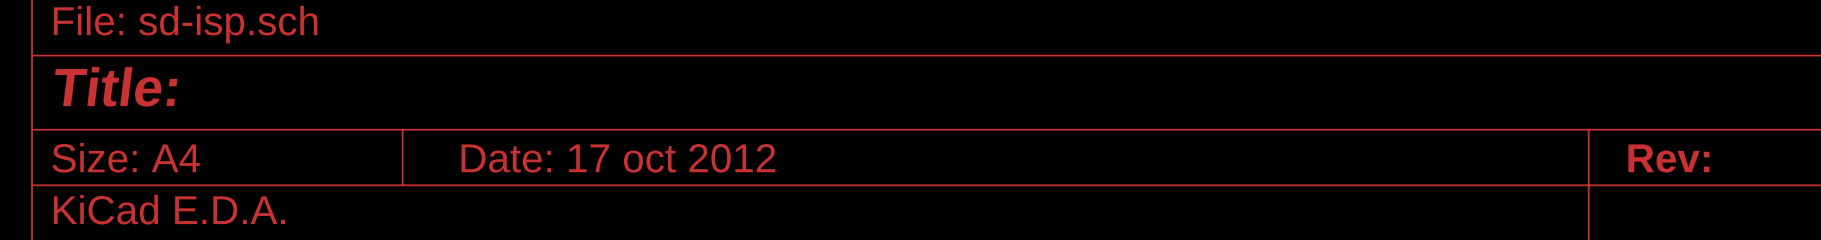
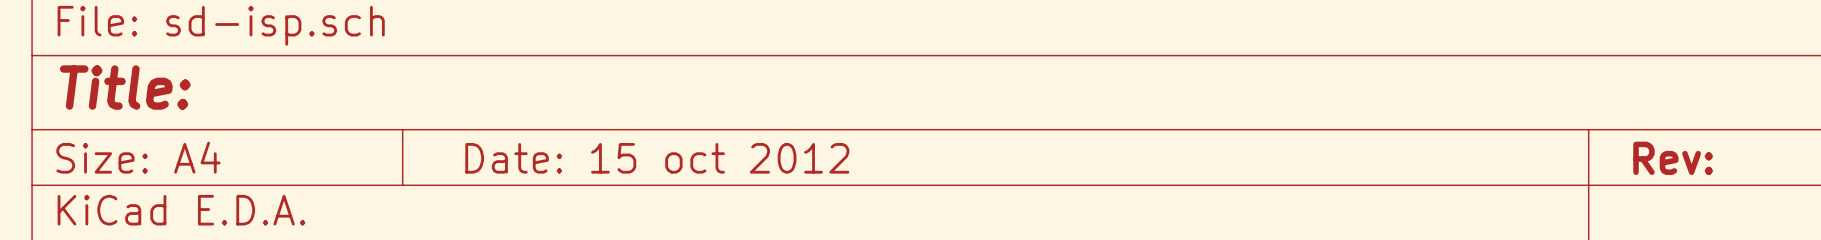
title block: Date: 17 oct 2012 (618, 158) -> Date: 15 oct 2012 (657, 158)

